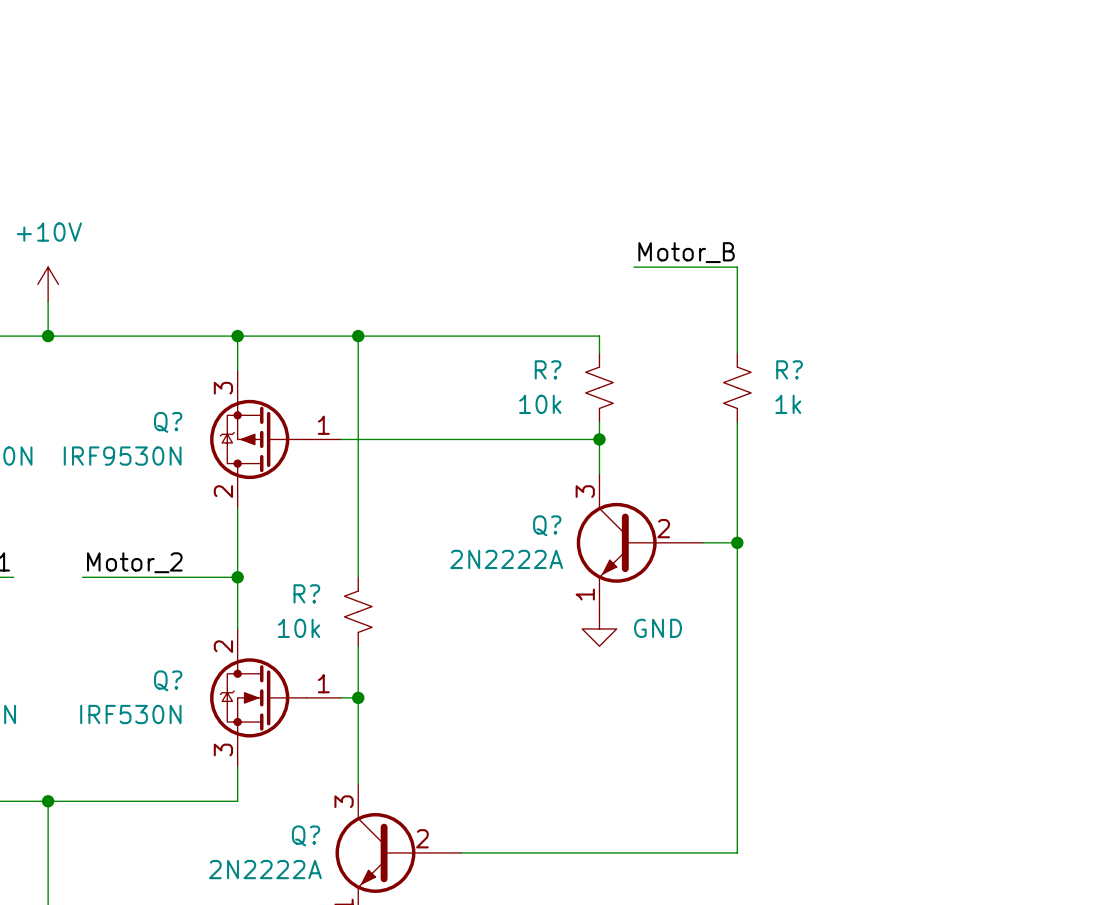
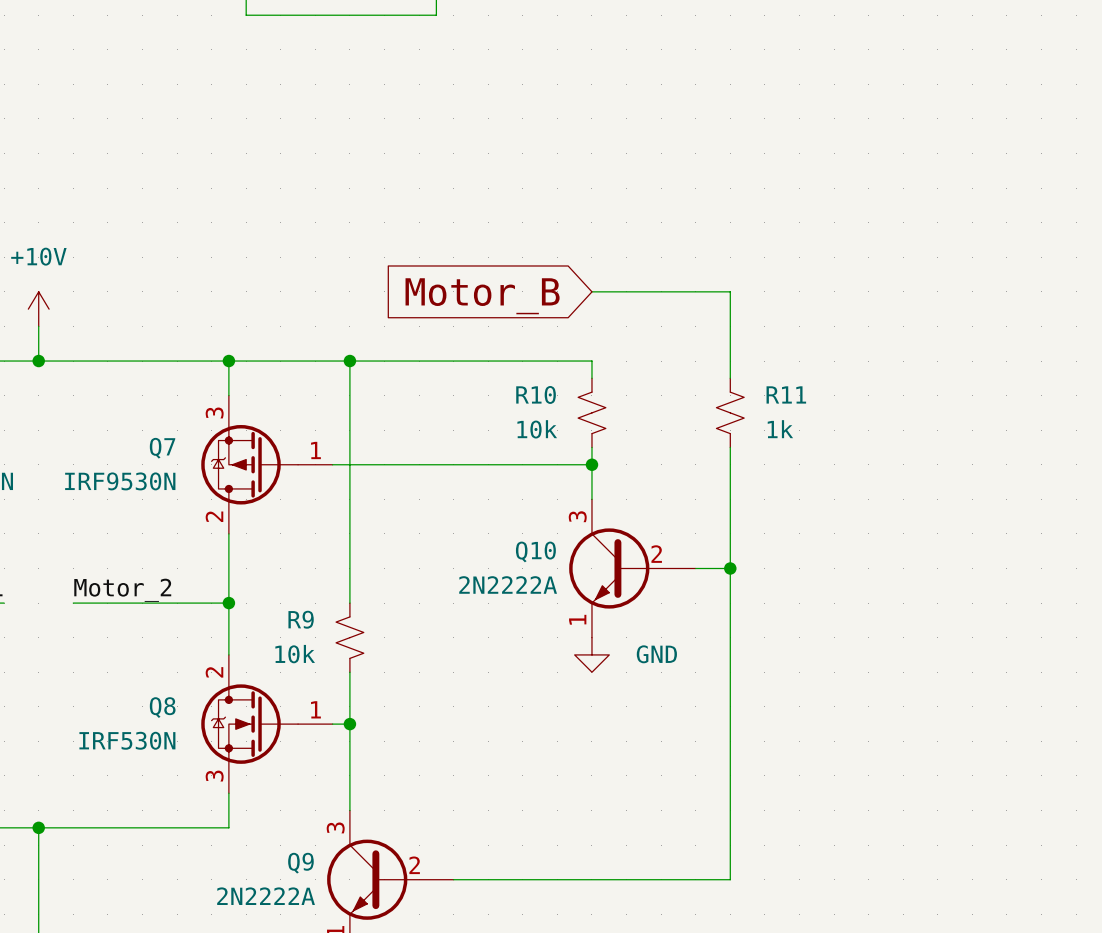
label: Motor_B (686, 252) -> none
wire: none -> (591, 291) (626, 291)
global label: none -> Motor_B (482, 296)
R? name: R? (548, 369) -> R10 (536, 394)
R? name: R? (789, 369) -> R11 (786, 394)
Q? name: Q? (168, 422) -> Q7 (162, 448)
Q? name: Q? (547, 525) -> Q10 (535, 551)
R? name: R? (306, 593) -> R9 (301, 619)
Q? name: Q? (168, 680) -> Q8 (162, 707)
Q? name: Q? (306, 835) -> Q9 (300, 863)

